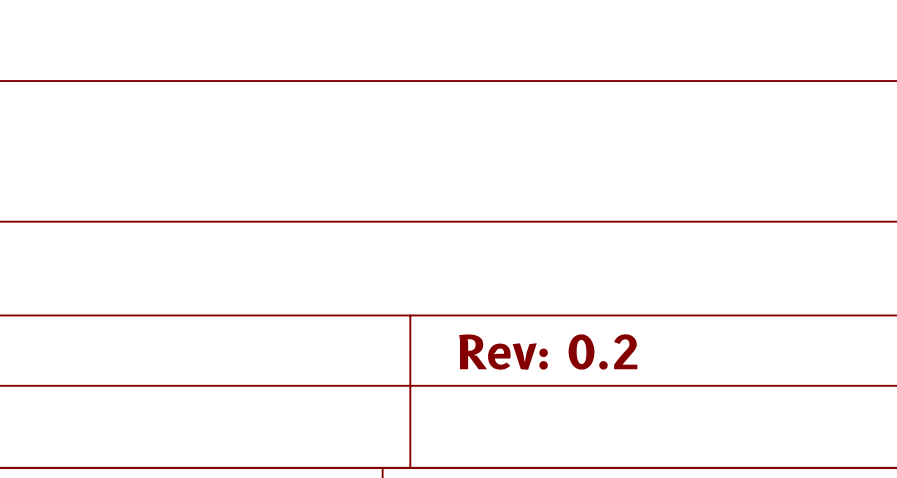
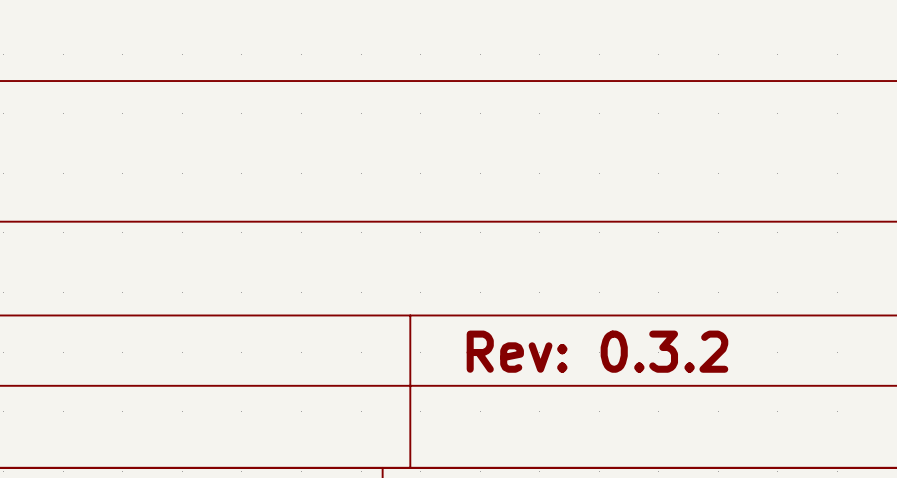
title block: Rev: 0.2 (548, 352) -> Rev: 0.3.2 (597, 351)

